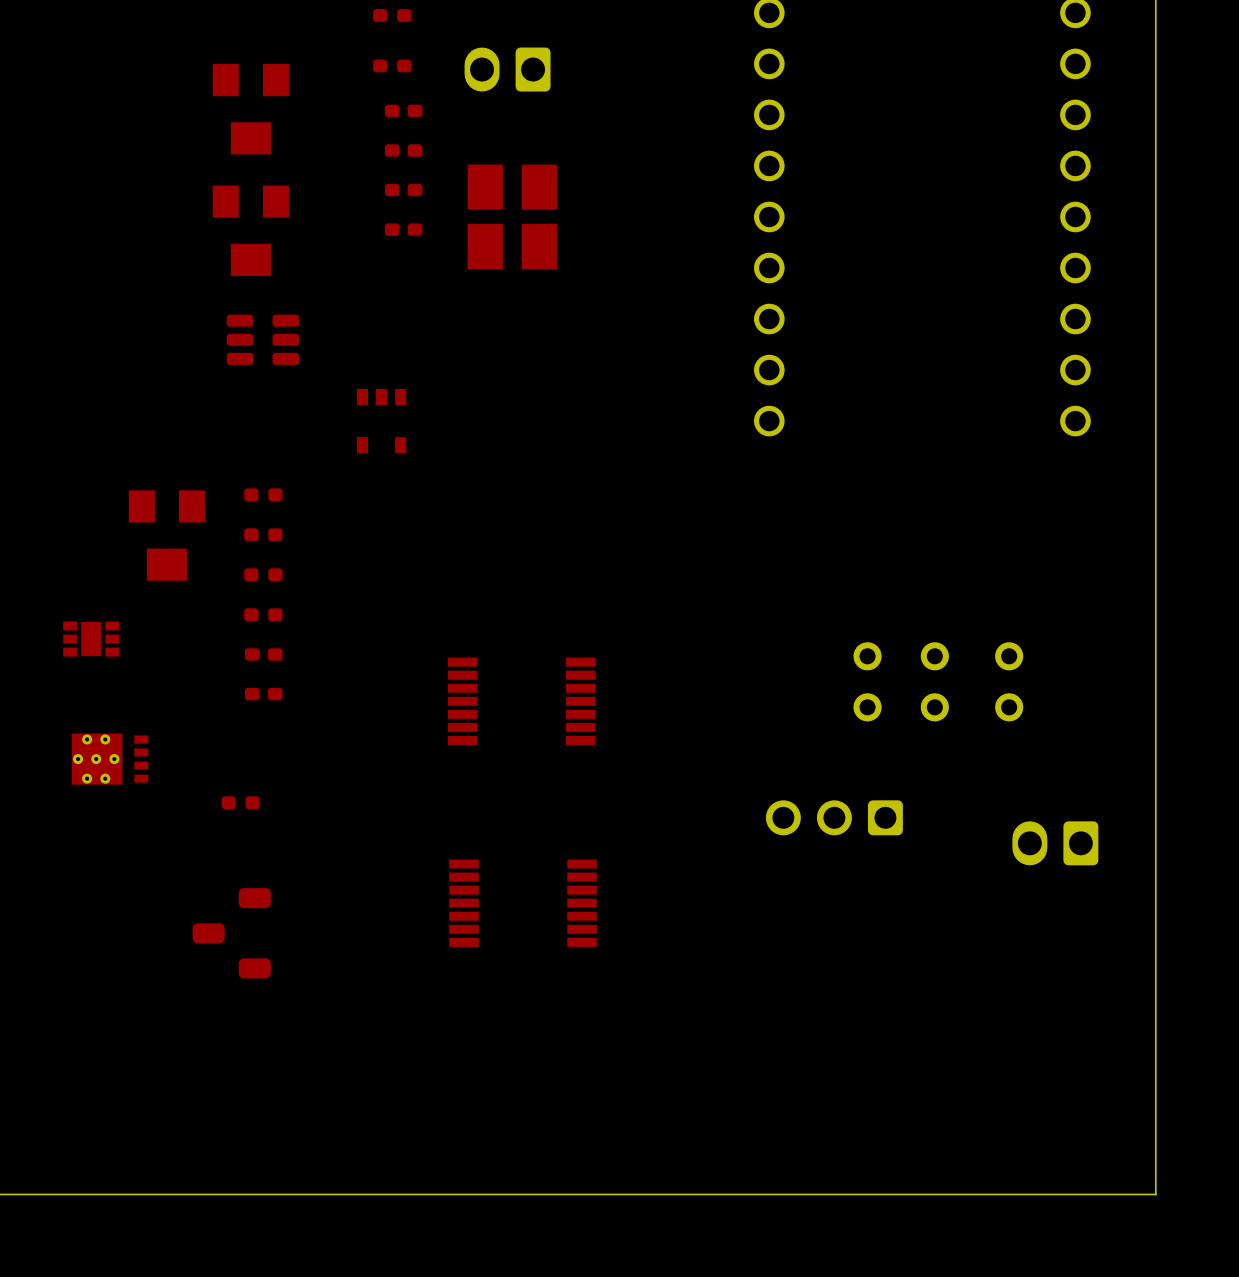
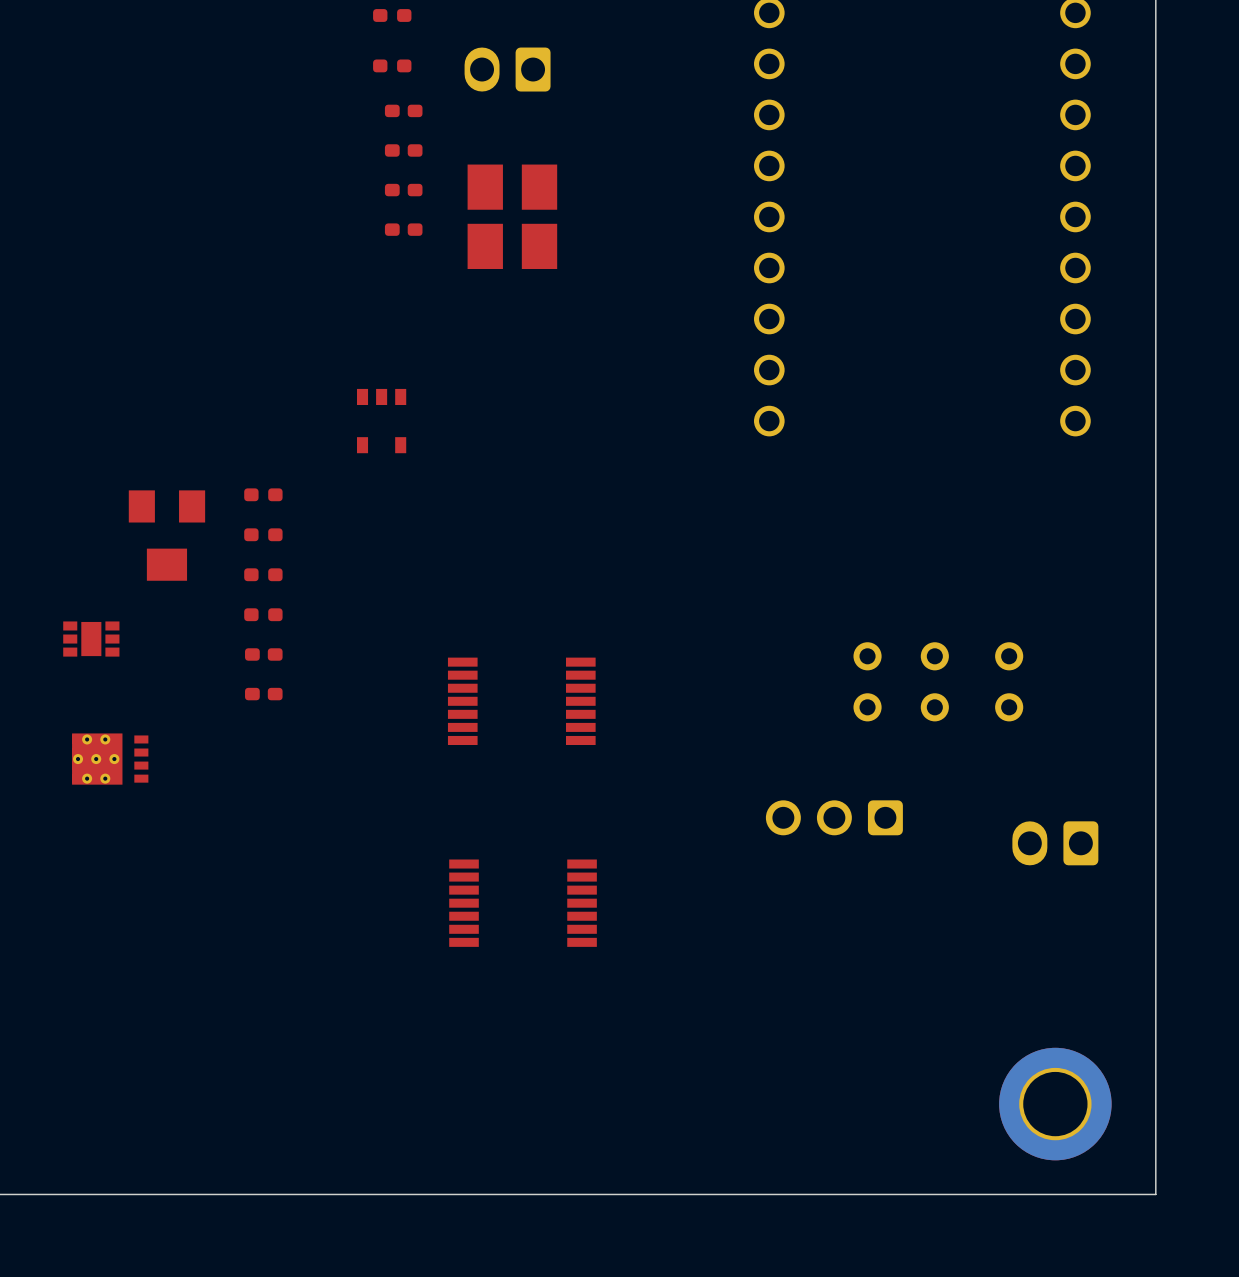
part: (250, 109) -> none
part: (250, 230) -> none
part: (262, 339) -> none
part: (240, 802) -> none
part: (231, 933) -> none
part: none -> (1055, 1104)

